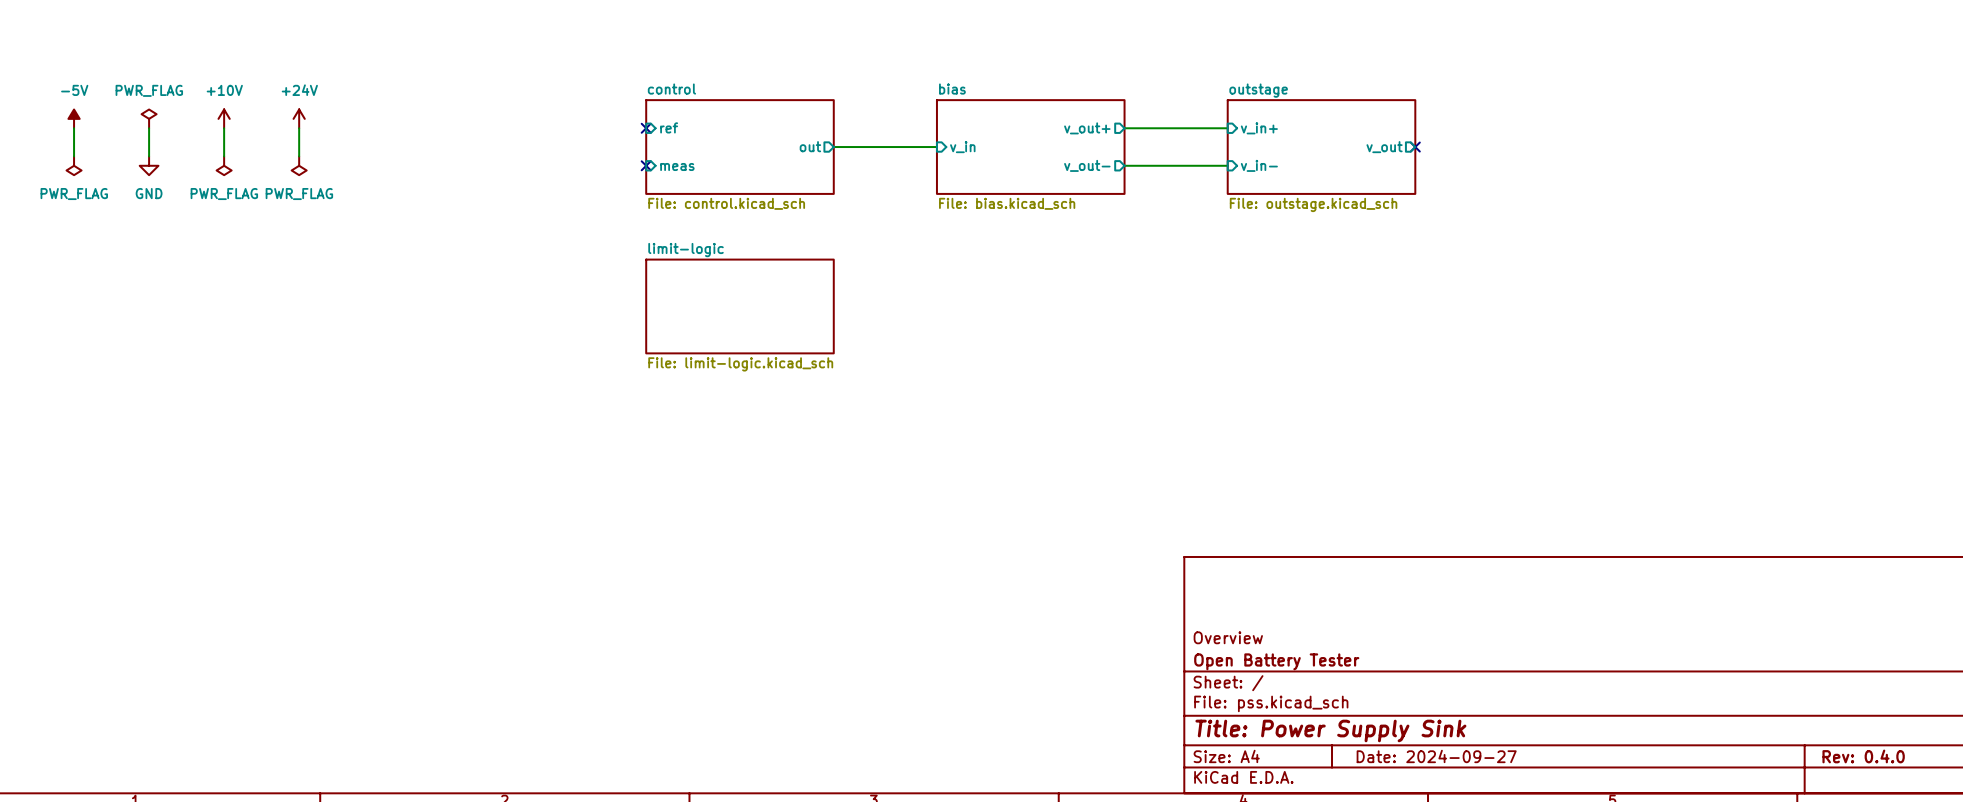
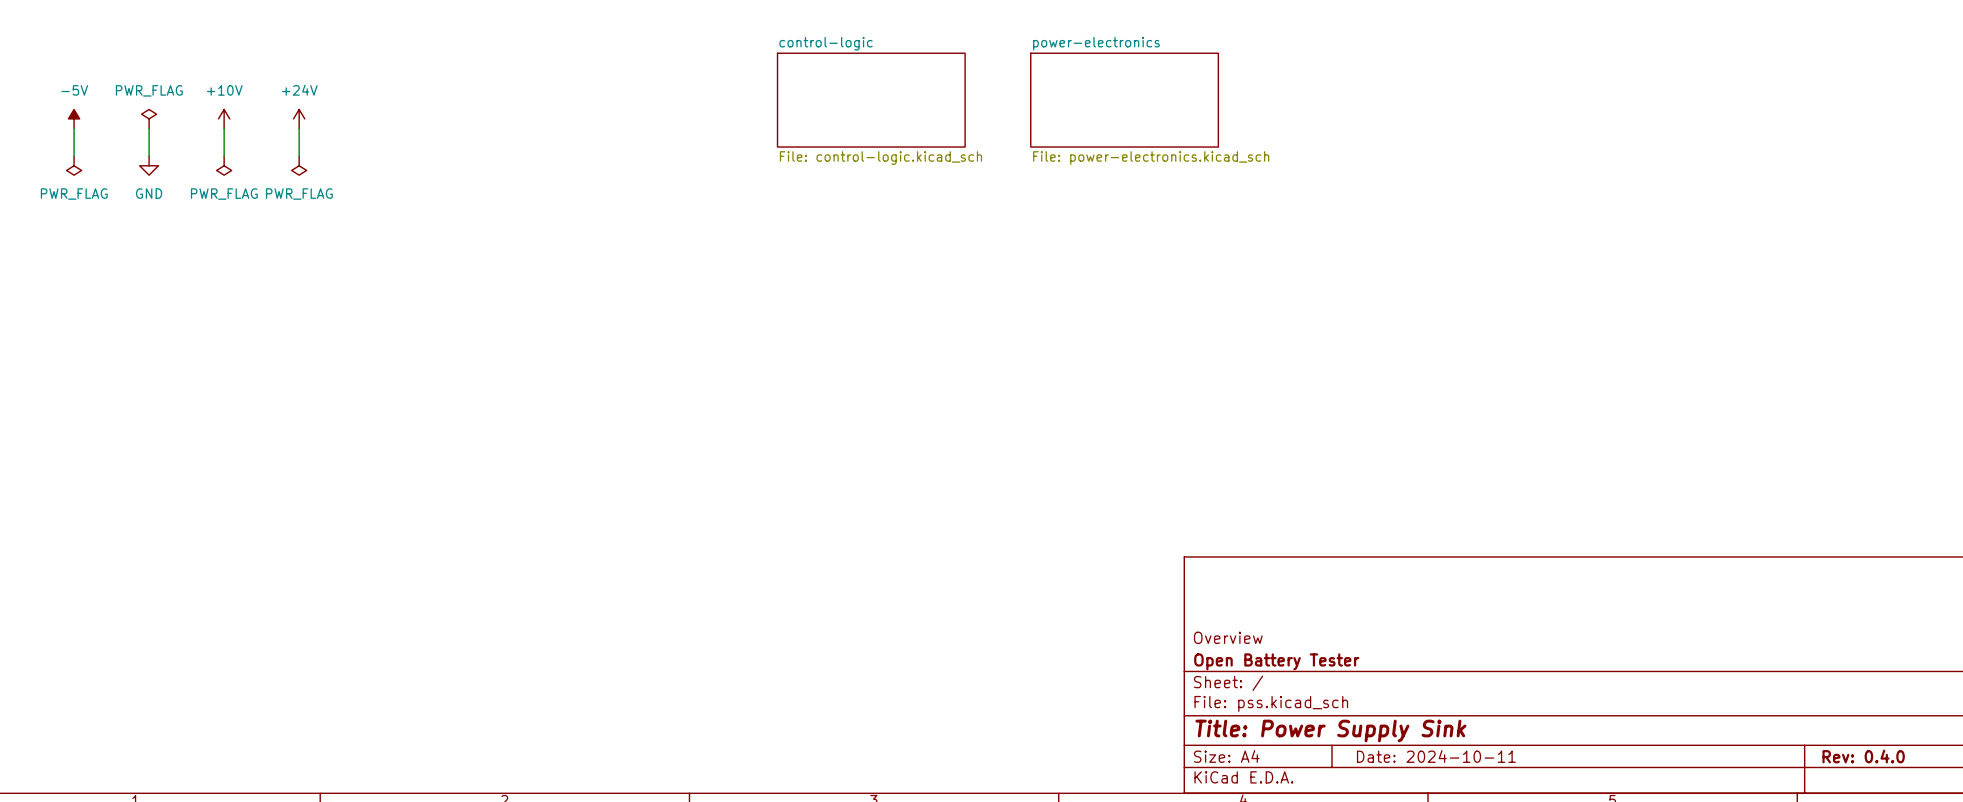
sheet control-logic: none -> File: control-logic.kicad_sch (871, 100)
sheet power-electronics: none -> File: power-electronics.kicad_sch (1124, 100)
sheet pin: ref (669, 127) -> none
no-connect mark: (646, 128) -> none
sheet pin: v_out+ (1087, 128) -> none
wire: (1124, 128) (1227, 128) -> none
sheet pin: v_in+ (1259, 128) -> none
sheet pin: out (810, 146) -> none
sheet control: File: control.kicad_sch (739, 147) -> none
sheet pin: v_in (962, 147) -> none
sheet bias: File: bias.kicad_sch (1030, 147) -> none
sheet outstage: File: outstage.kicad_sch (1321, 147) -> none
sheet pin: v_out (1384, 147) -> none
no-connect mark: (1415, 147) -> none
no-connect mark: (646, 165) -> none
sheet pin: v_out- (1087, 165) -> none
wire: (1124, 165) (1227, 165) -> none
sheet pin: v_in- (1259, 165) -> none
sheet pin: meas (677, 167) -> none
sheet limit-logic: File: limit-logic.kicad_sch (739, 306) -> none
title block: Date: 2024-09-27 (1436, 756) -> Date: 2024-10-11 (1436, 756)

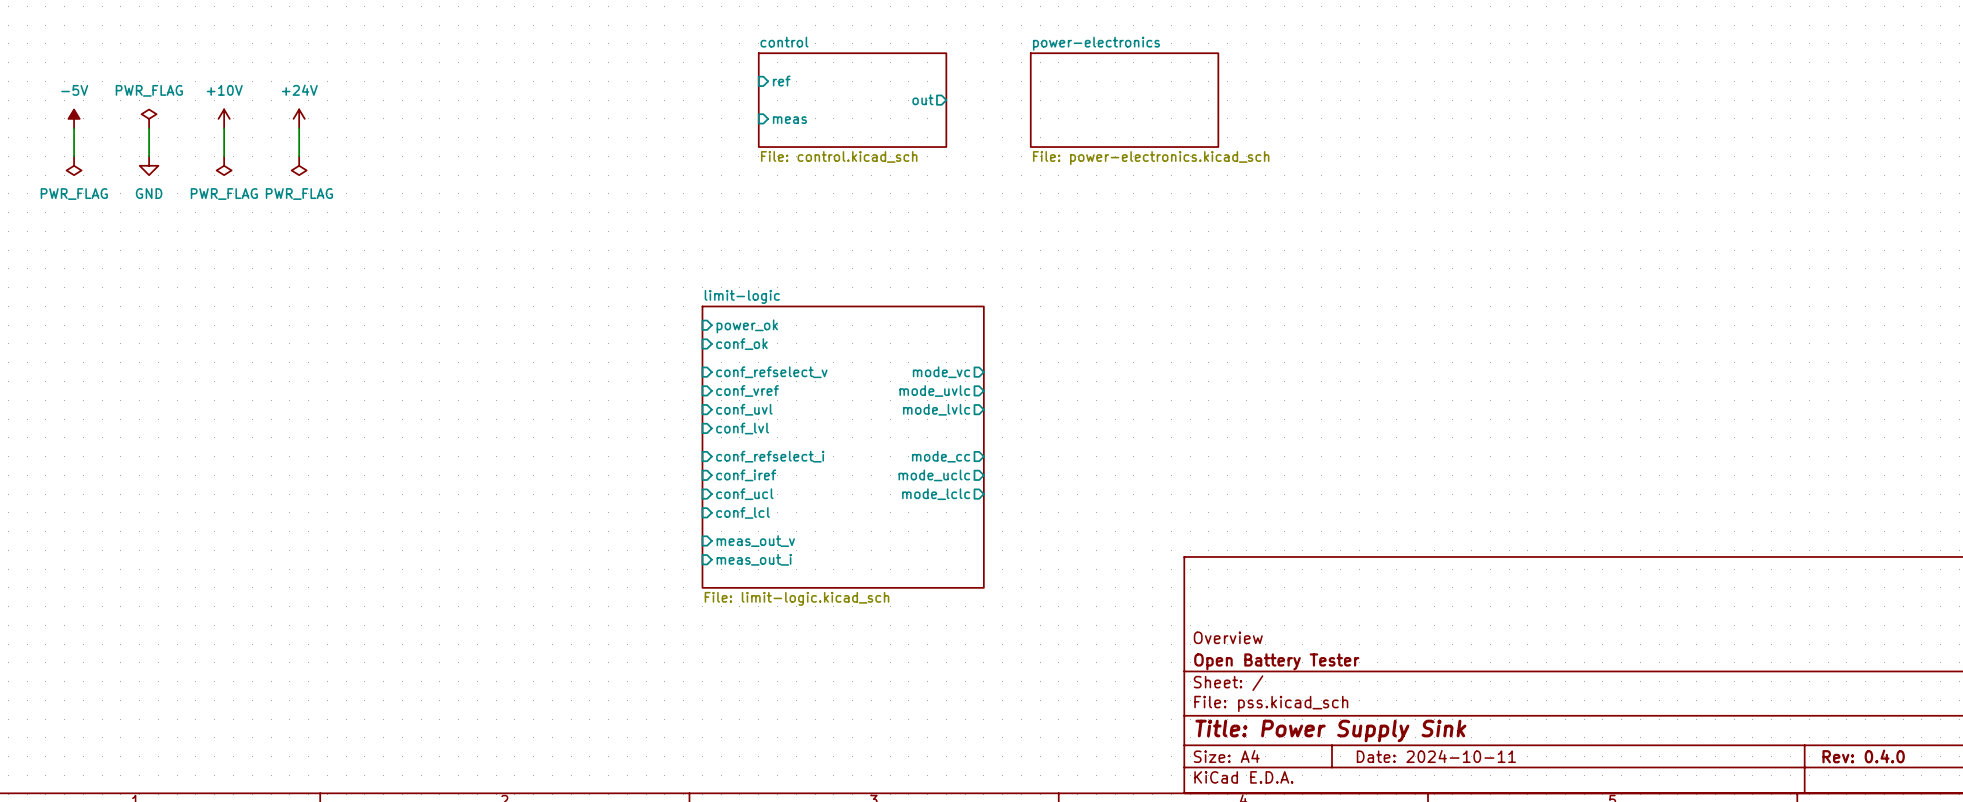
sheet pin: none -> ref (781, 81)
sheet pin: none -> out (922, 99)
sheet control: none -> File: control.kicad_sch (852, 100)
sheet control-logic: File: control-logic.kicad_sch (871, 100) -> none
sheet pin: none -> meas (789, 120)
sheet pin: none -> power_ok (747, 326)
sheet pin: none -> conf_ok (741, 344)
sheet pin: none -> conf_refselect_v (771, 372)
sheet pin: none -> mode_vc (941, 372)
sheet pin: none -> conf_vref (747, 390)
sheet pin: none -> mode_uvlc (934, 390)
sheet pin: none -> conf_uvl (744, 409)
sheet pin: none -> mode_lvlc (936, 409)
sheet pin: none -> conf_lvl (742, 428)
sheet limit-logic: none -> File: limit-logic.kicad_sch (843, 447)
sheet pin: none -> conf_refselect_i (770, 456)
sheet pin: none -> mode_cc (941, 456)
sheet pin: none -> conf_iref (746, 475)
sheet pin: none -> mode_uclc (934, 475)
sheet pin: none -> conf_ucl (744, 494)
sheet pin: none -> mode_lclc (936, 494)
sheet pin: none -> conf_lcl (743, 512)
sheet pin: none -> meas_out_v (755, 541)
sheet pin: none -> meas_out_i (754, 559)

